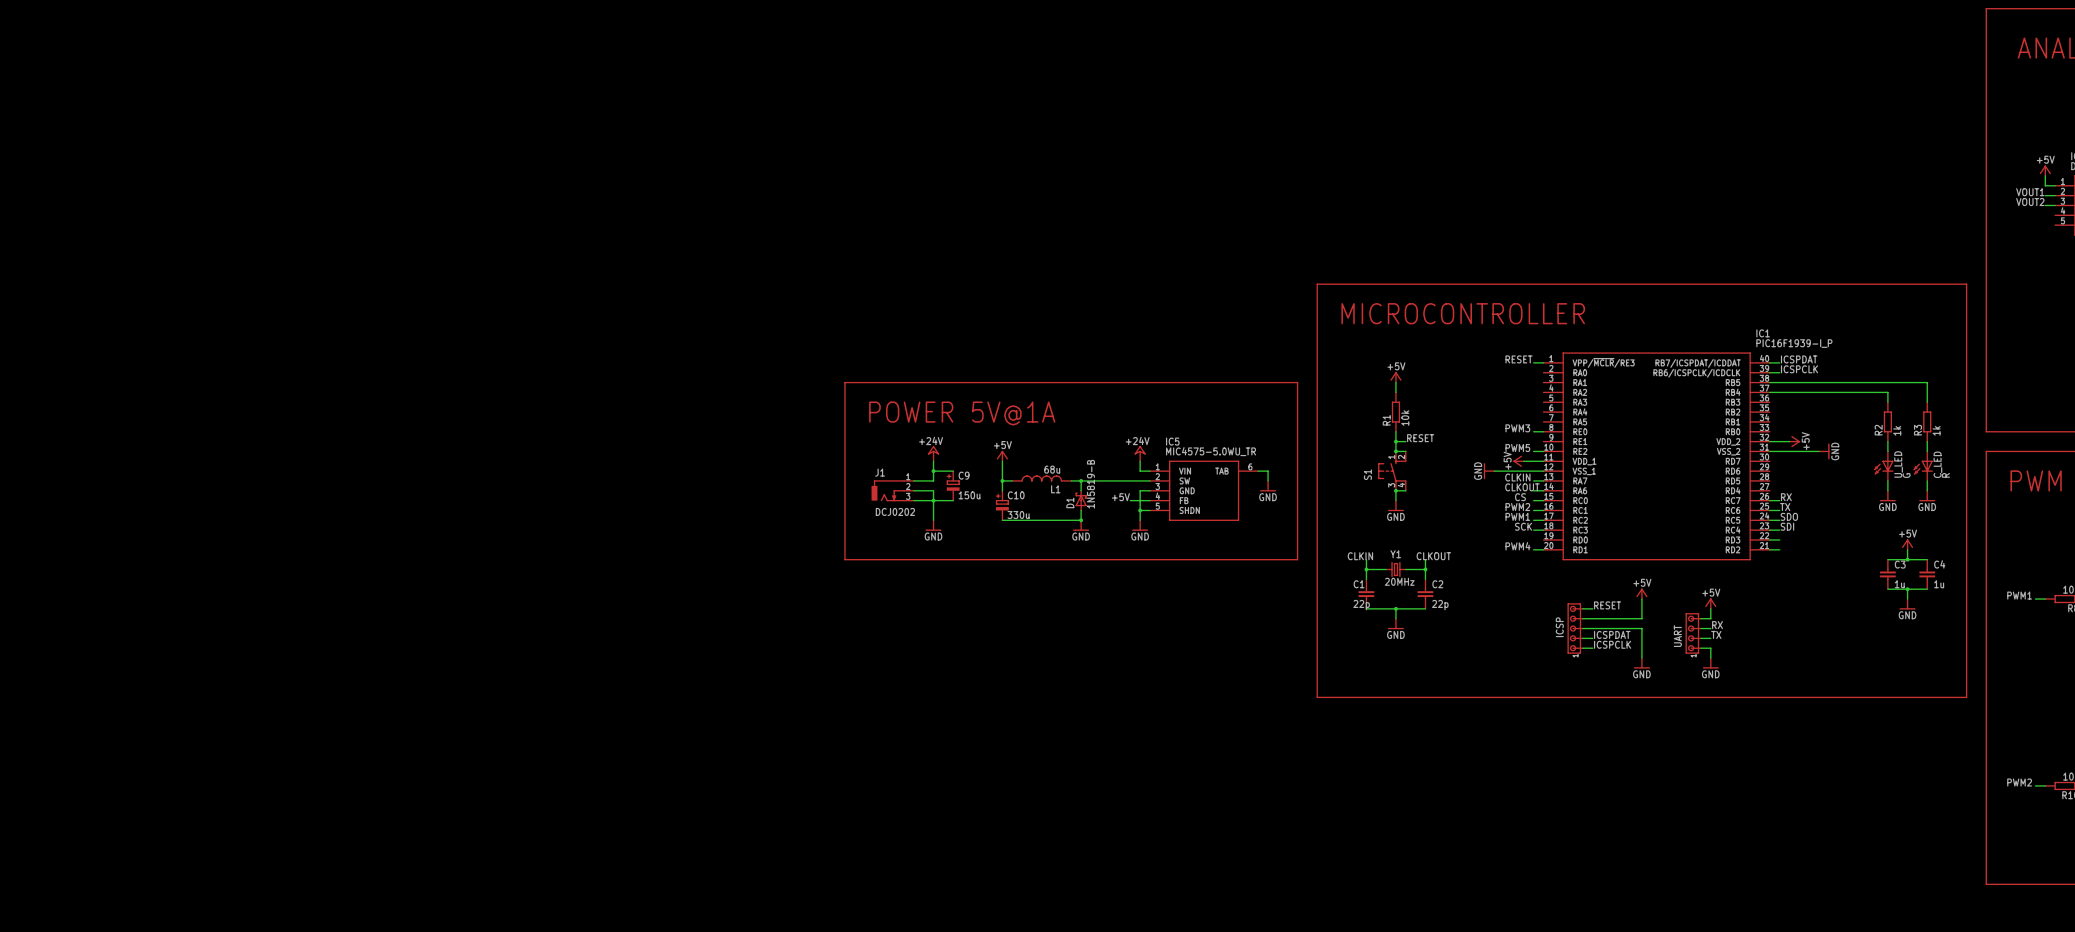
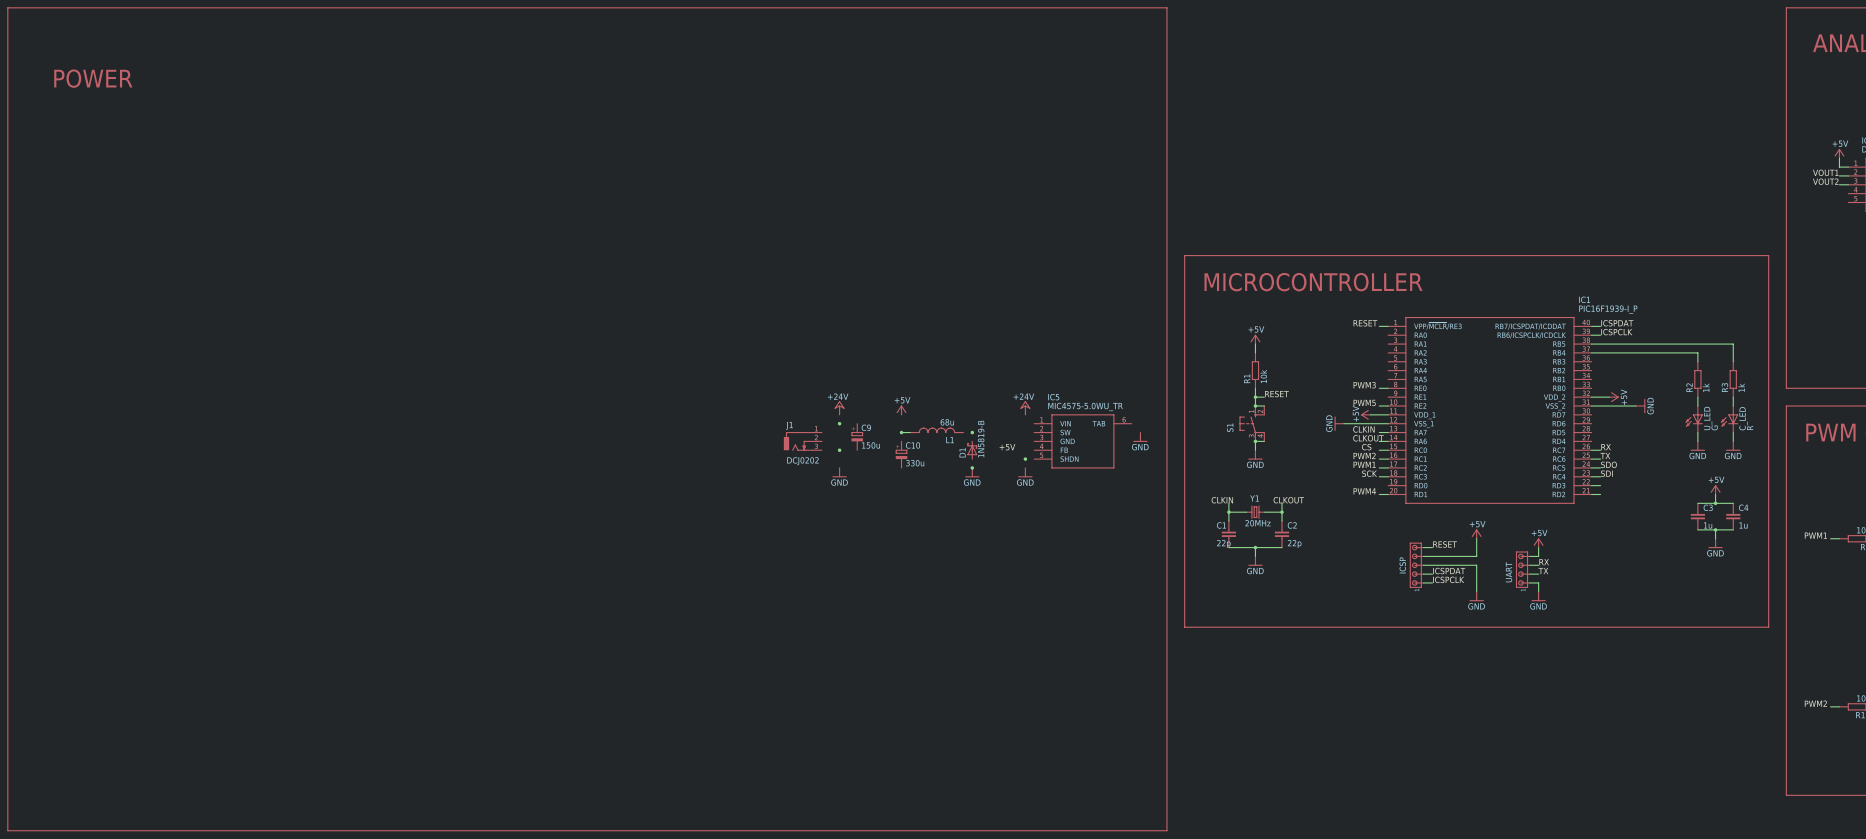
text: none -> POWER (93, 78)
line: (1297, 382) (844, 382) (844, 559) (1297, 559) -> (1166, 344) (1166, 7) (7, 7) (7, 830) (1166, 830) (1166, 503)
text: POWER 5V@1A (962, 413) -> none
wire: (933, 461) (933, 480) (913, 480) -> none
wire: (1002, 461) (1002, 490) -> none
wire: (1140, 461) (1140, 471) (1149, 471) -> none
wire: (933, 471) (953, 471) -> none
wire: (1258, 471) (1268, 471) (1268, 480) -> none
wire: (1071, 480) (1149, 480) -> none
wire: (1081, 480) (1081, 490) -> none
wire: (913, 490) (933, 490) (933, 520) -> none
wire: (1149, 490) (1140, 490) (1140, 520) -> none
wire: (913, 500) (953, 500) -> none
wire: (1130, 500) (1149, 500) -> none
wire: (1081, 510) (1081, 520) (1002, 520) -> none
wire: (1140, 510) (1149, 510) -> none

